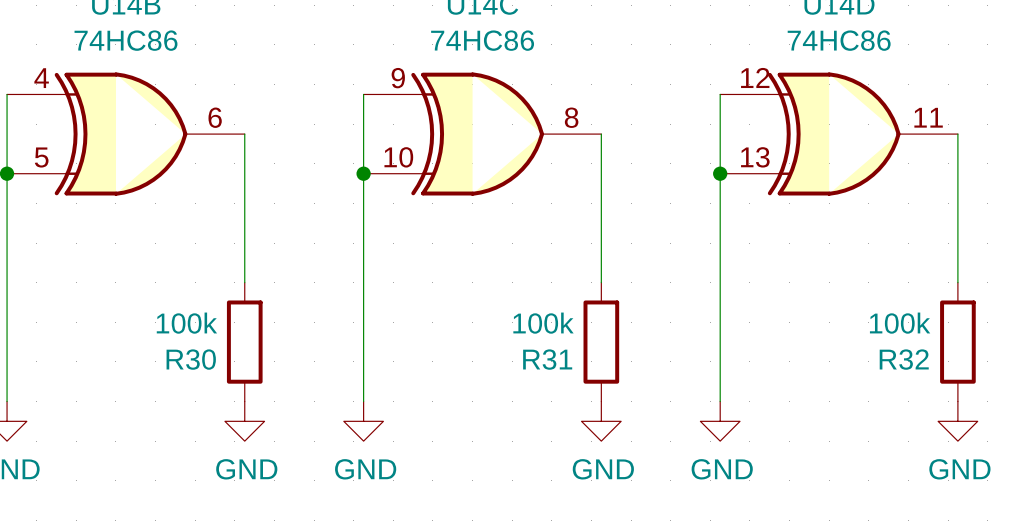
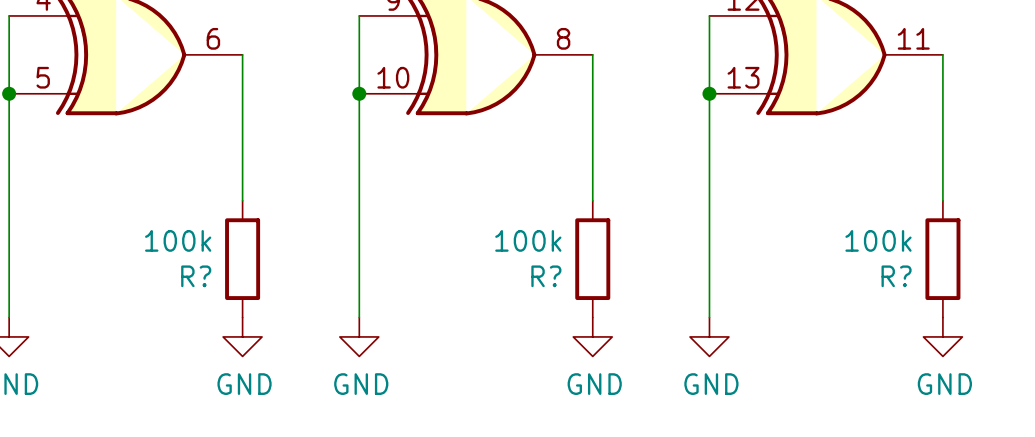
R30 name: R30 (191, 359) -> R? (196, 276)
R31 name: R31 (547, 359) -> R? (546, 276)
R32 name: R32 (904, 359) -> R? (896, 276)

